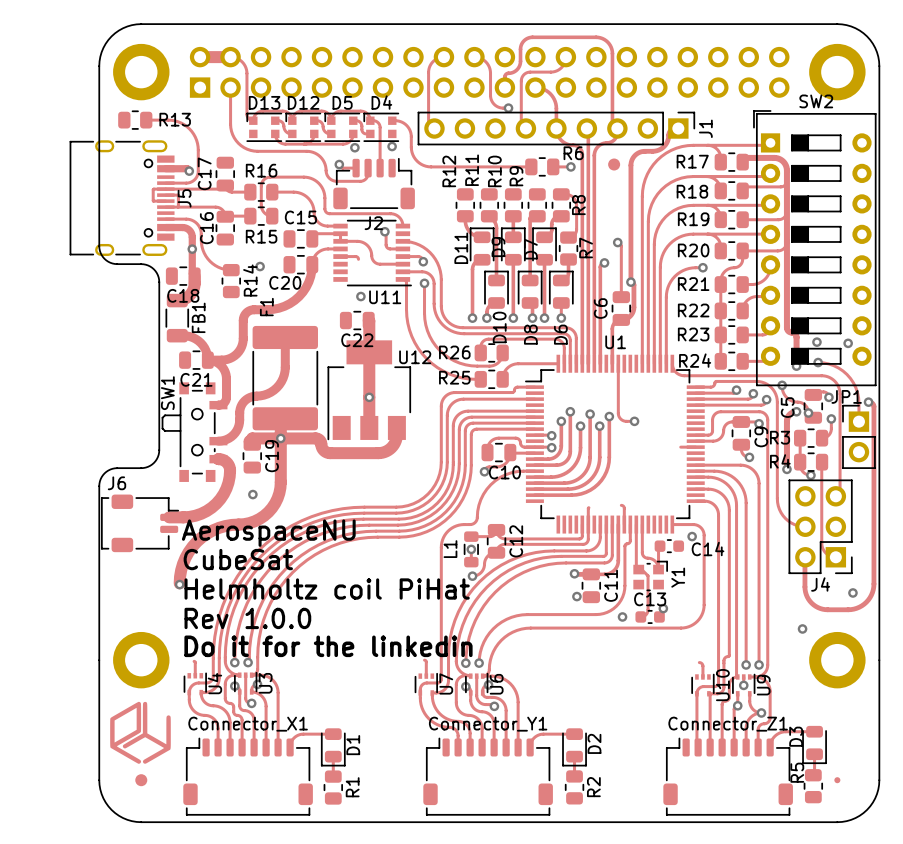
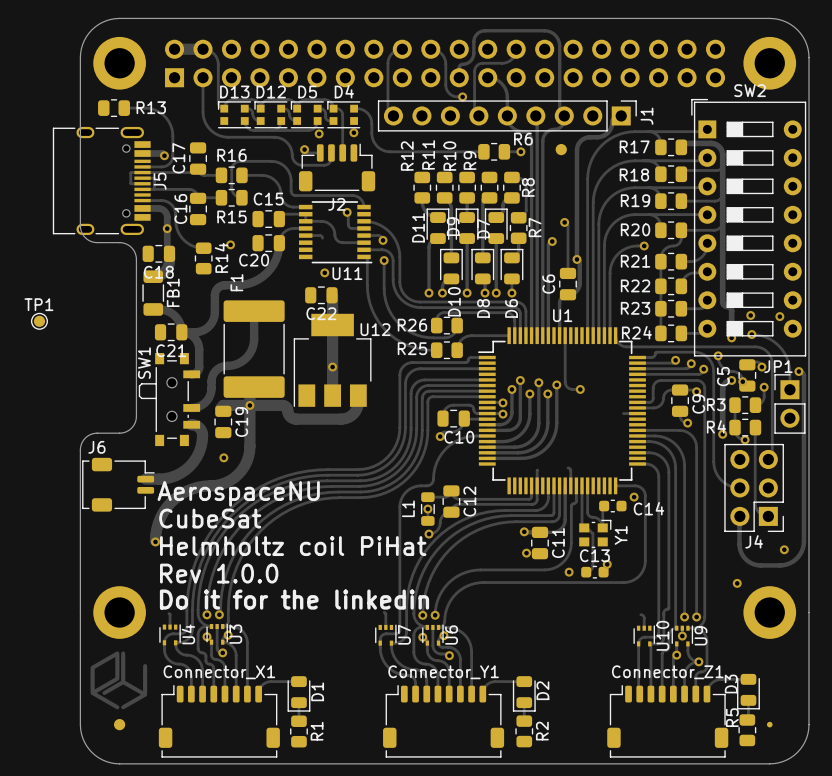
TP1: none -> (39, 321)

